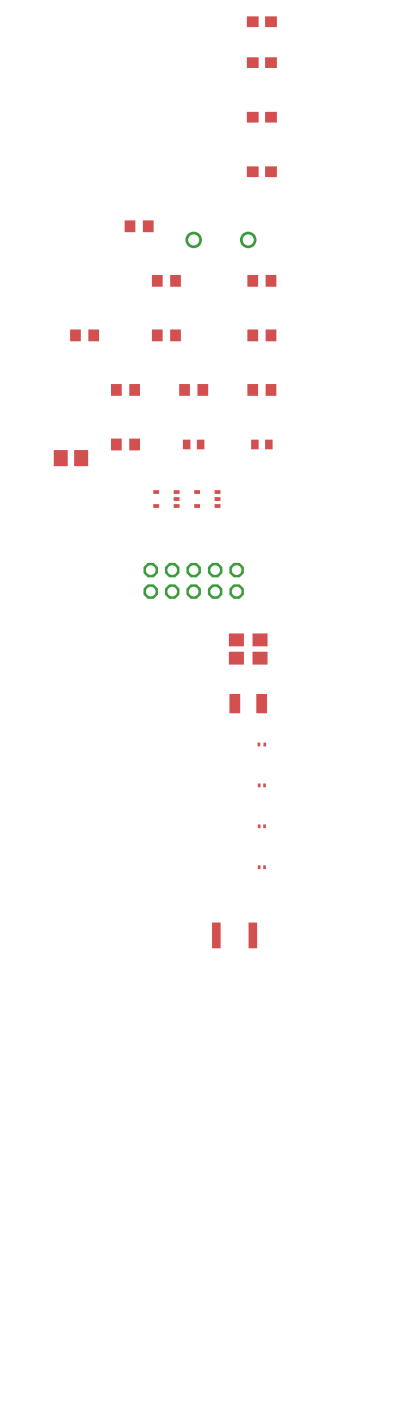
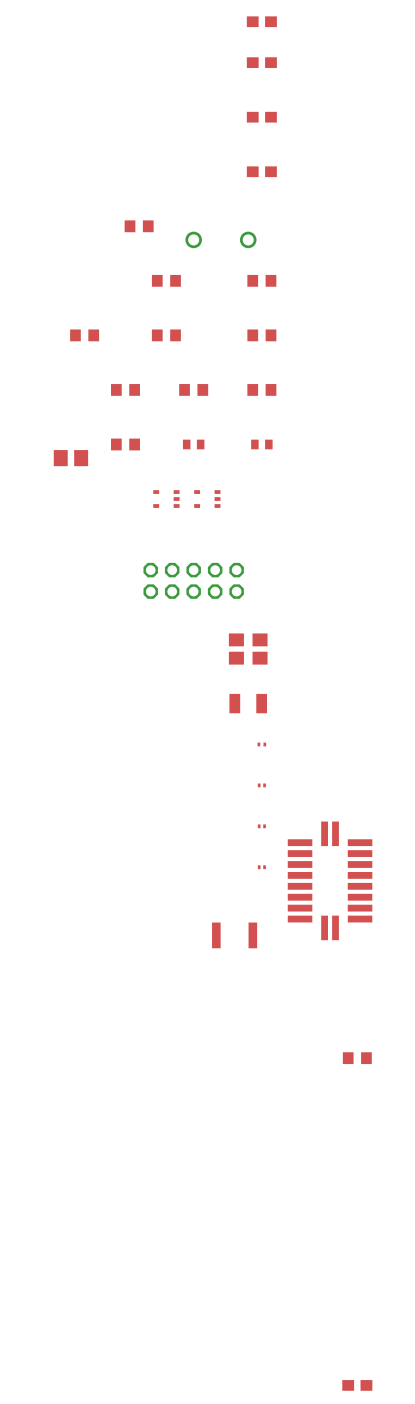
part: none -> (330, 880)
part: none -> (357, 1058)
part: none -> (357, 1385)

